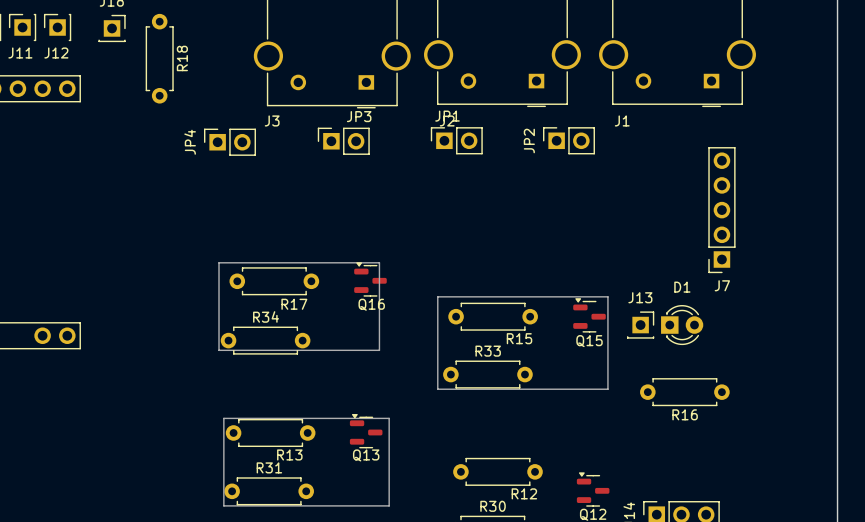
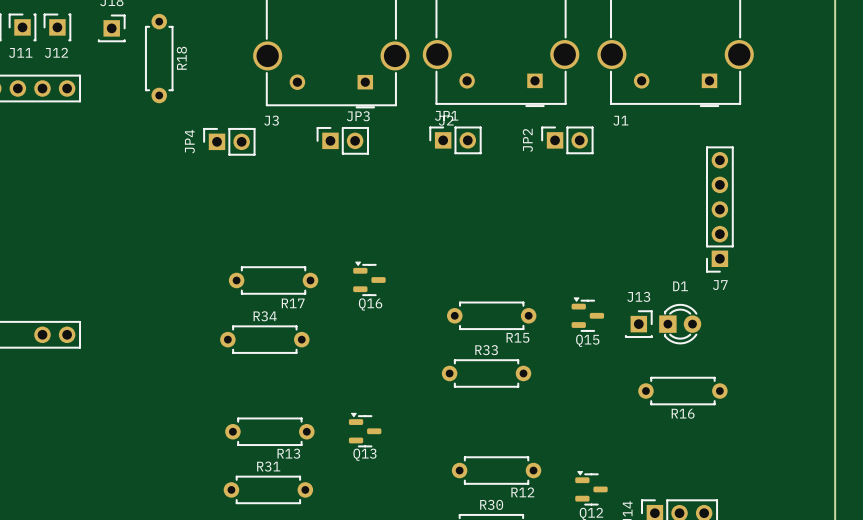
line: (219, 262) (379, 262) (379, 350) (219, 350) (219, 262) -> none
line: (437, 296) (607, 296) (607, 389) (437, 389) (437, 296) -> none
line: (223, 418) (389, 418) (389, 505) (223, 505) (223, 418) -> none

